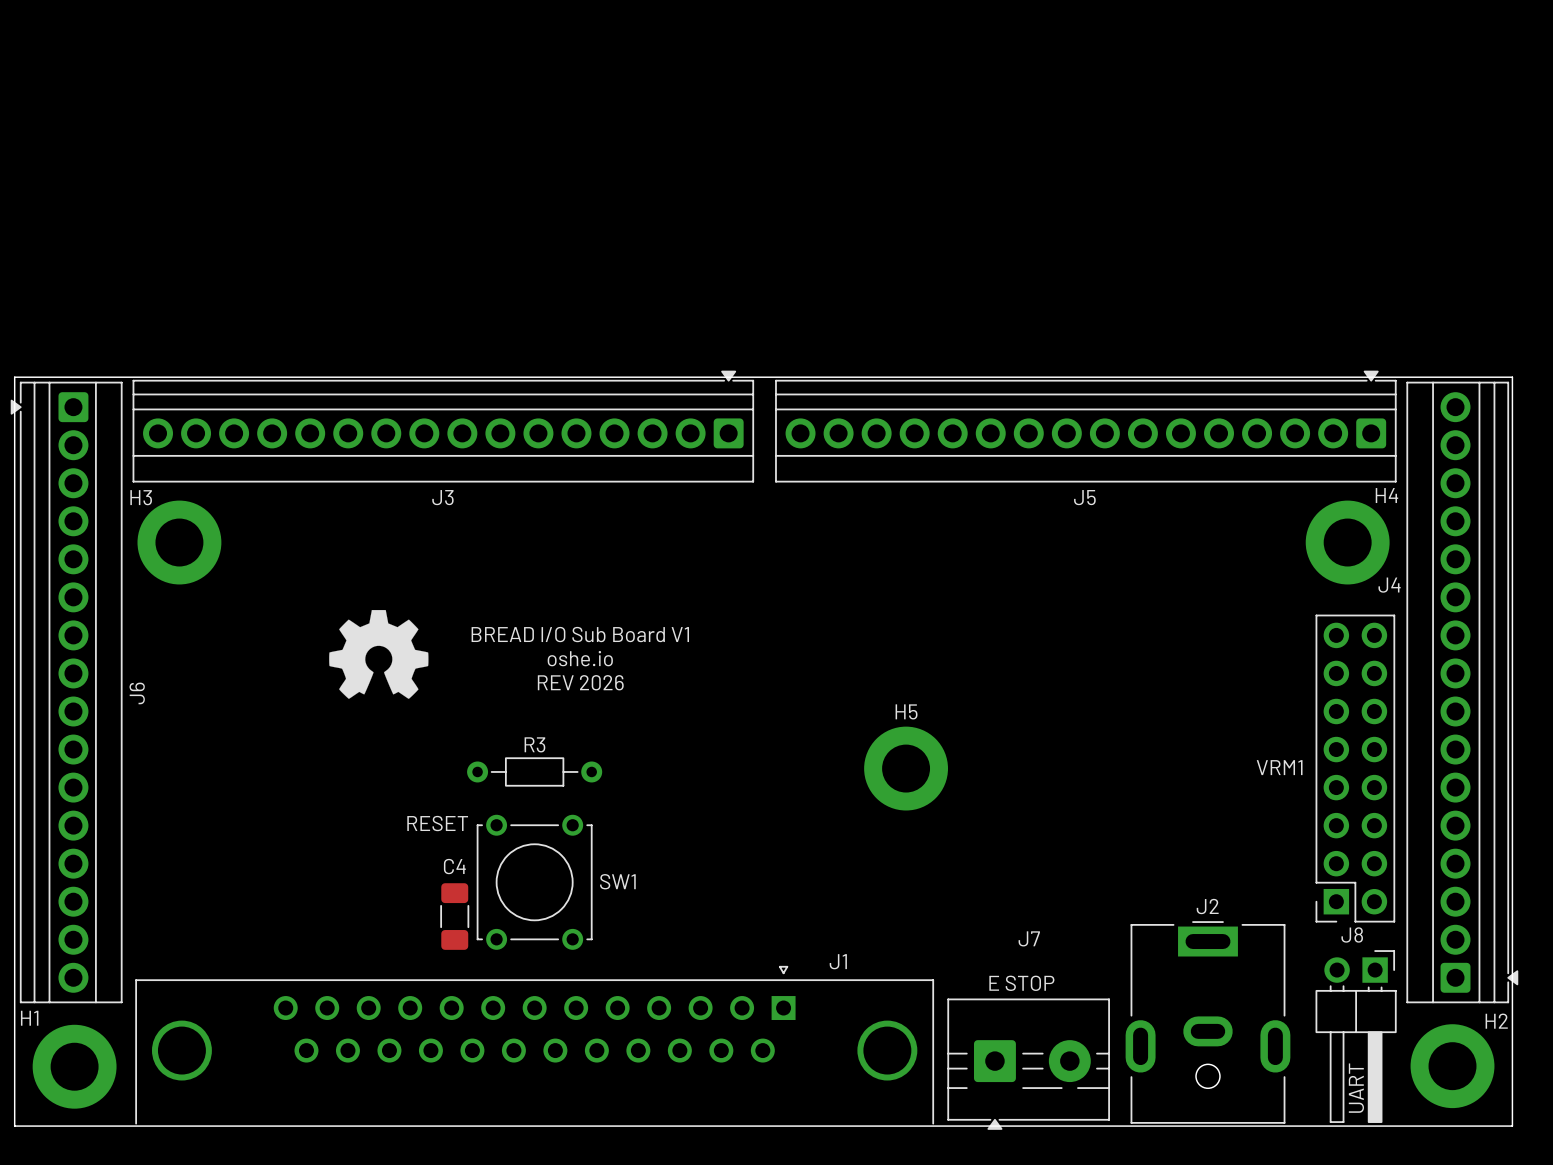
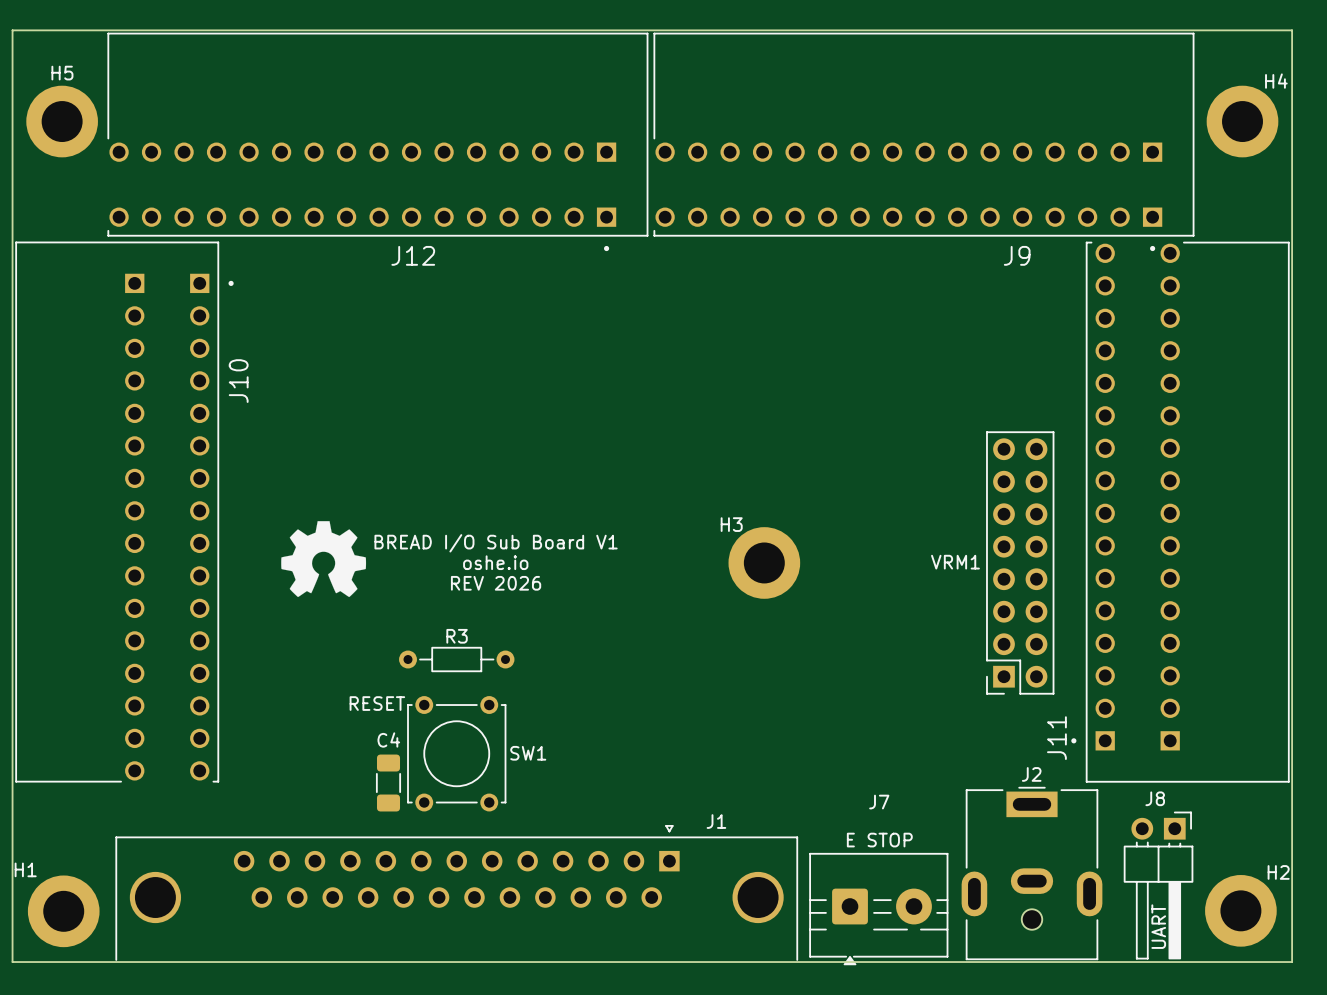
J12: none -> (377, 141)
J9: none -> (923, 141)
board edge: (14, 377) (1512, 377) -> (12, 322) (12, 30) (1292, 30) (1292, 322)
J3: (443, 426) -> none
J5: (1085, 426) -> none
H3 position: (179, 542) -> (764, 562)
H4 position: (1347, 542) -> (1242, 121)
J10: none -> (124, 512)
J11: none -> (1180, 512)
J6: (66, 692) -> none
J4: (1462, 692) -> none
H5 position: (906, 768) -> (62, 121)
VRM1 position: (1355, 768) -> (1020, 562)

